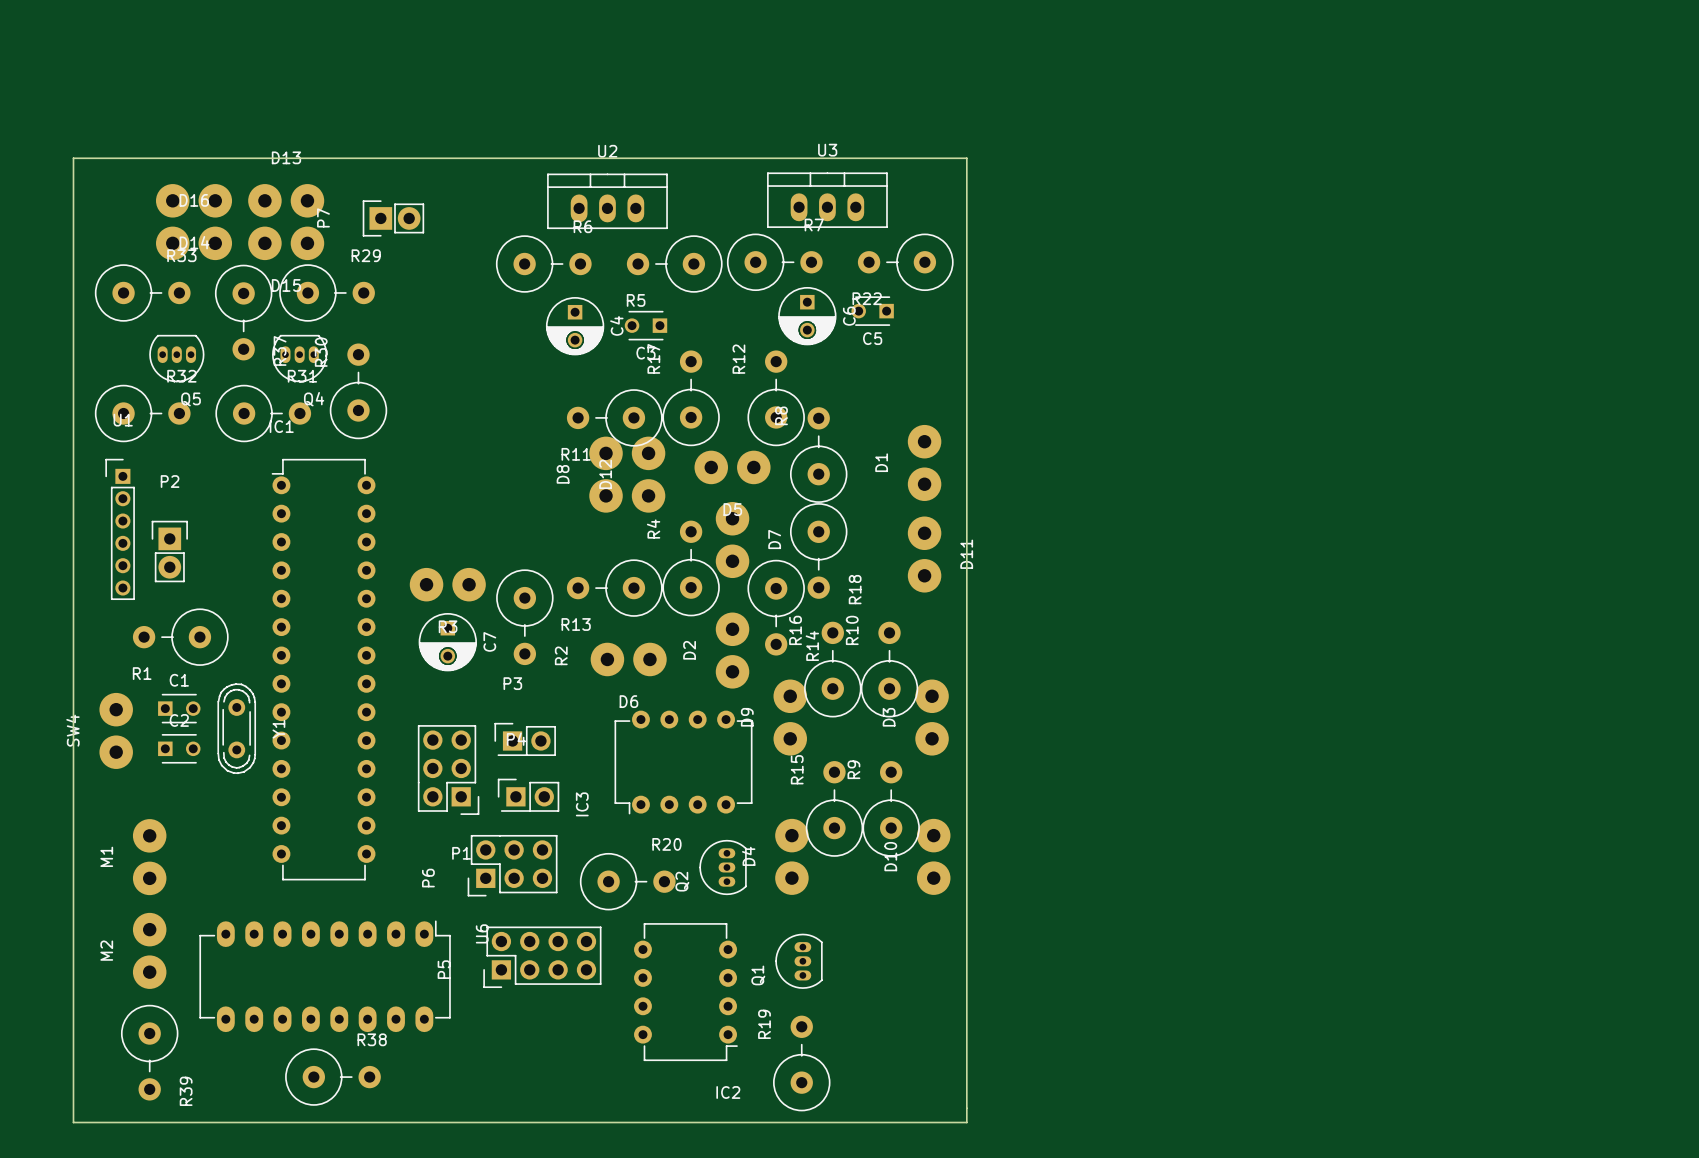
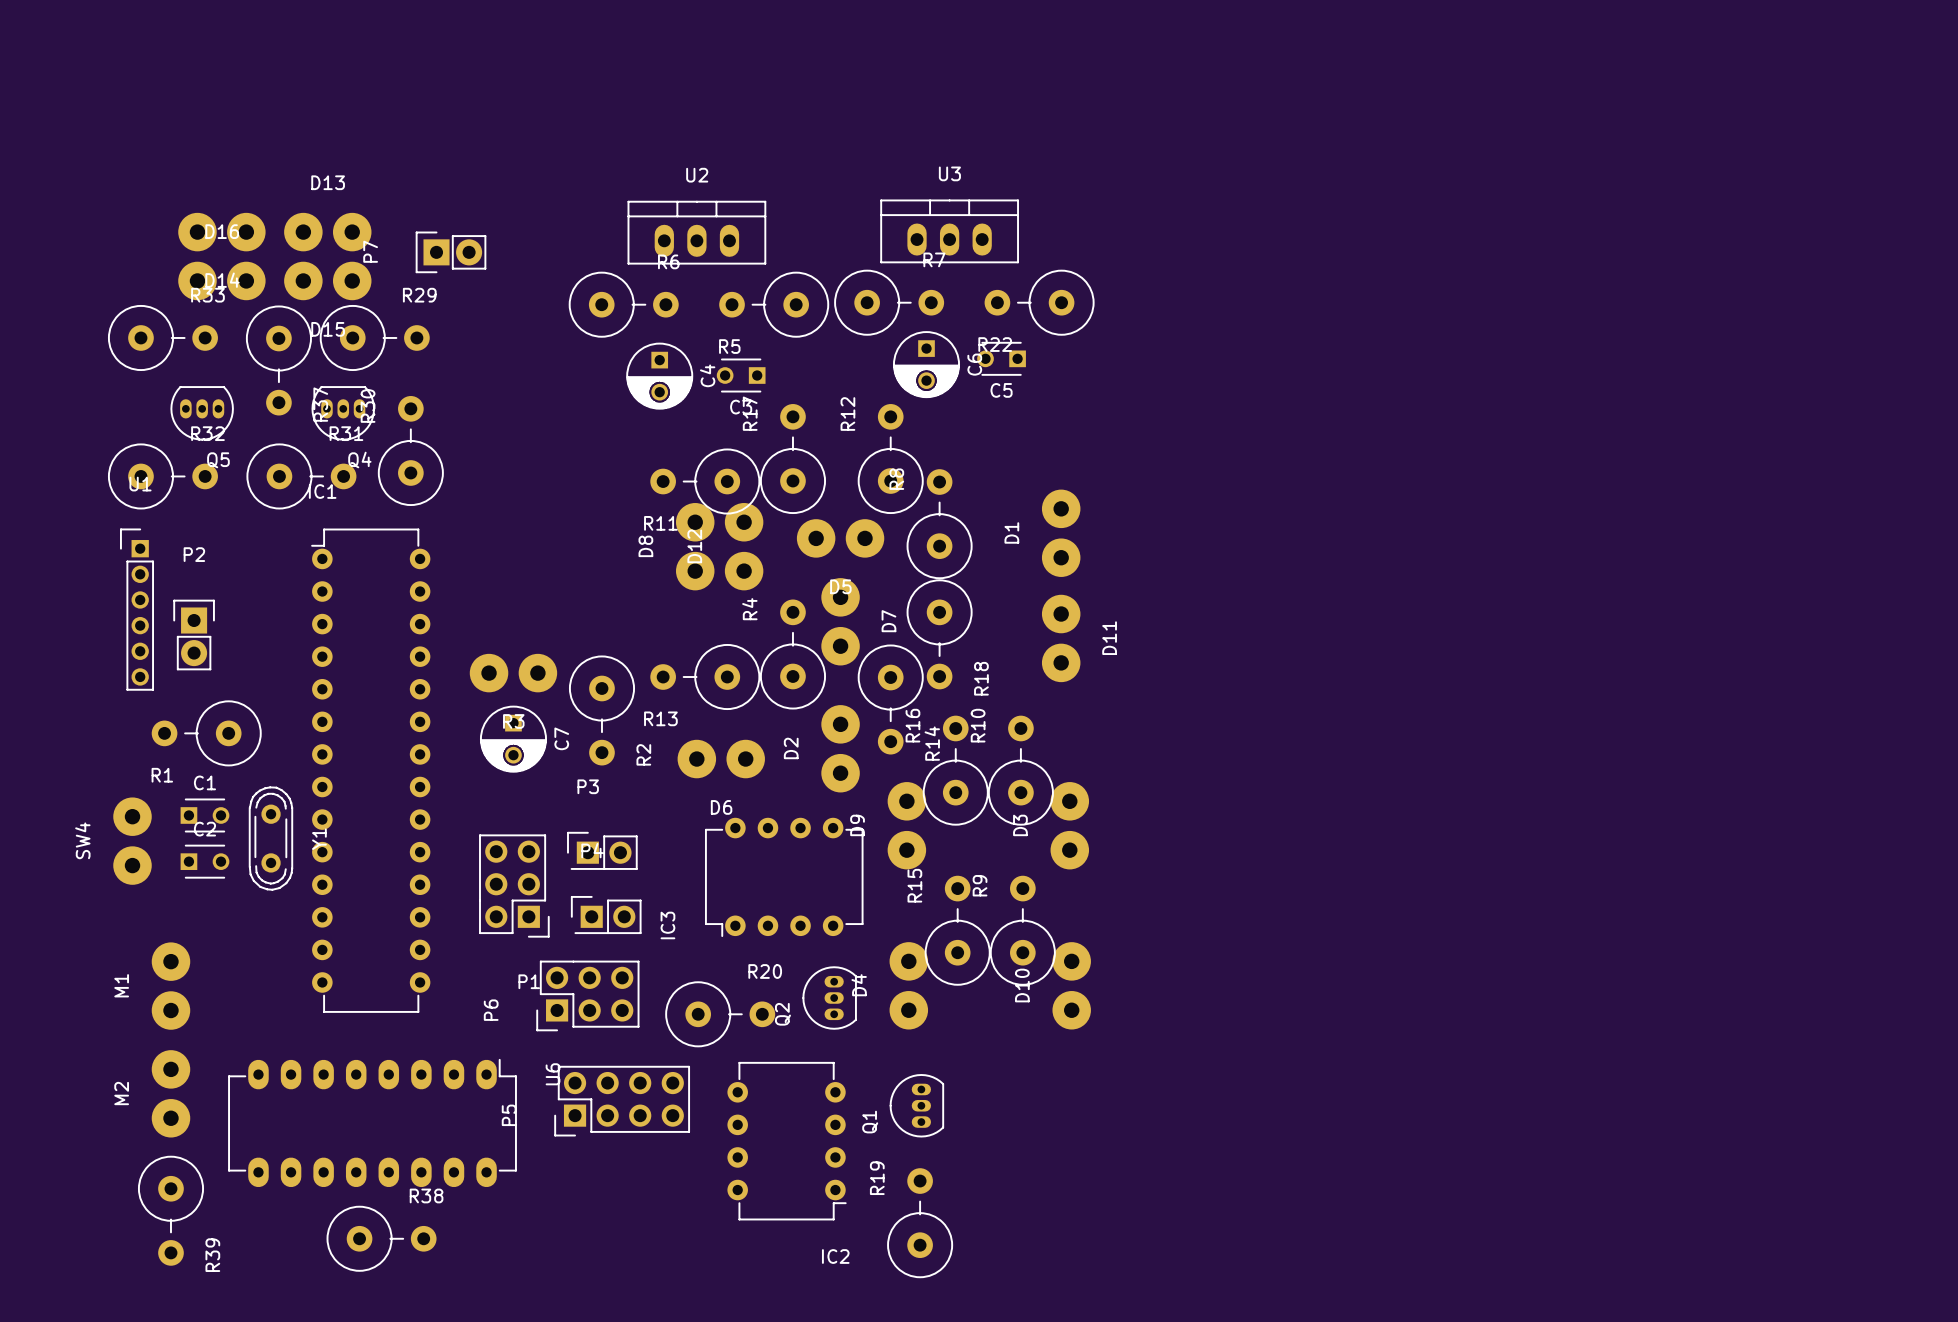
board edge: (73, 158) (966, 158) (966, 1122) (73, 1122) (73, 158) -> none

